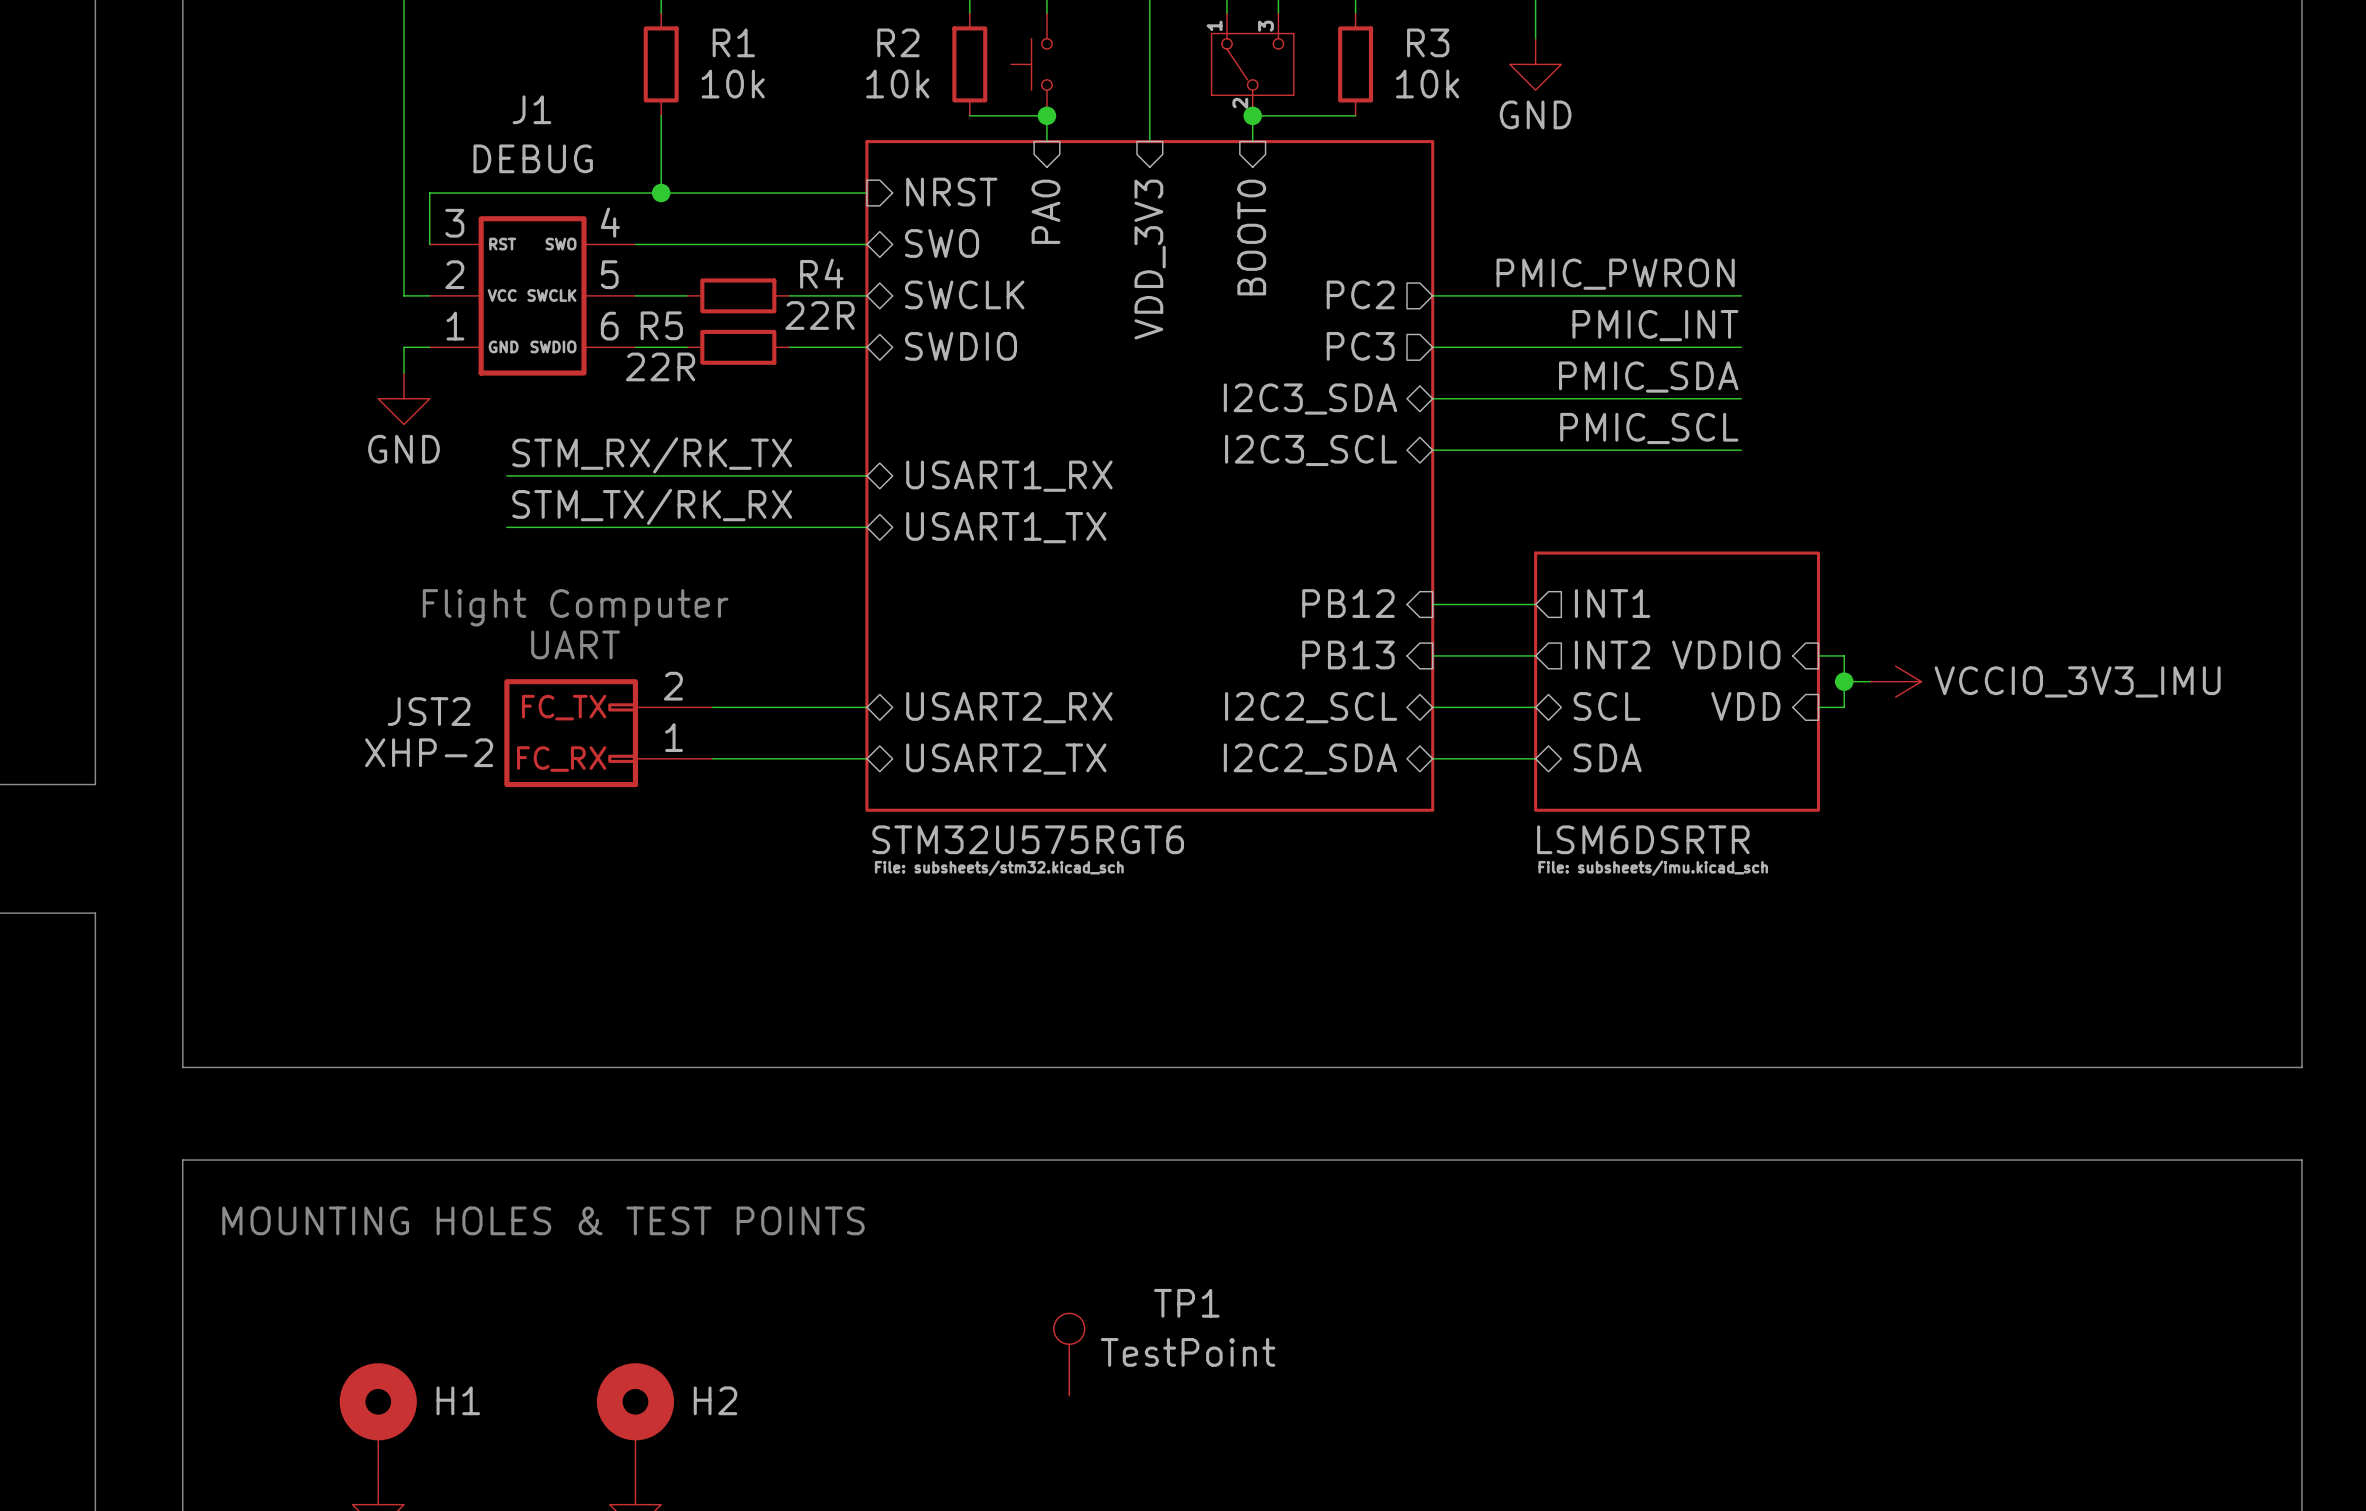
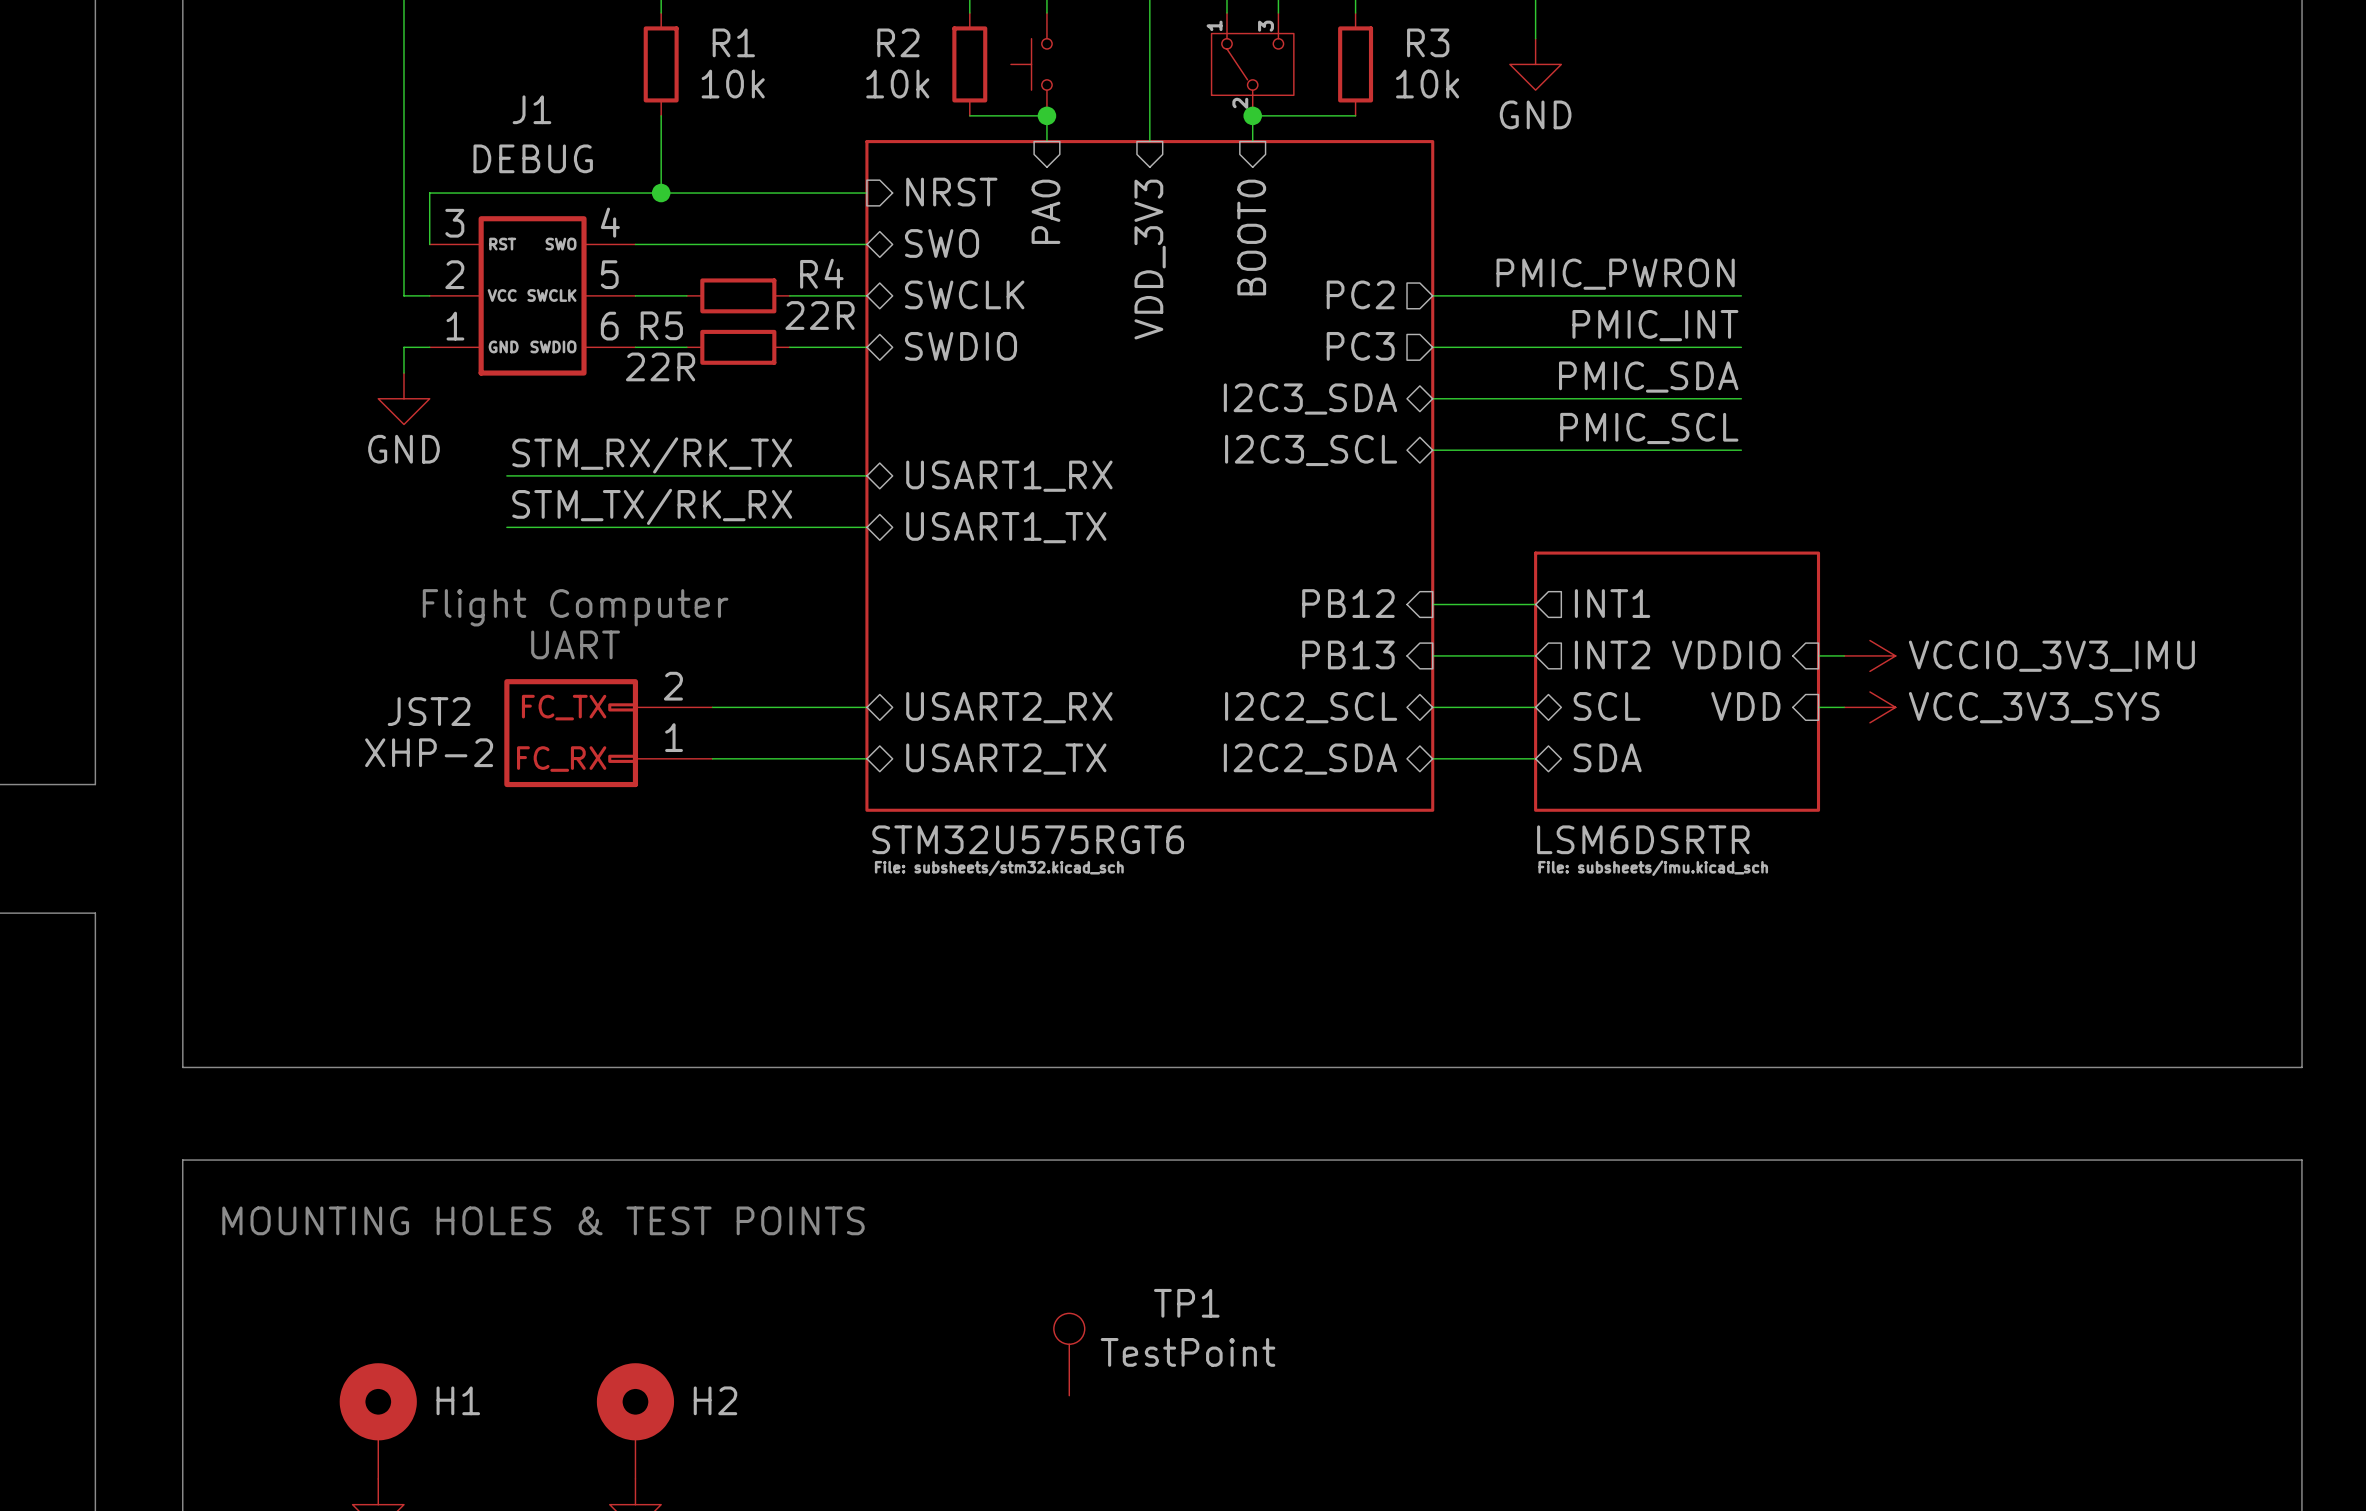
wire: (1844, 655) (1844, 707) -> none
wire: (1844, 681) (1869, 681) -> none
junction: (1844, 681) -> none
power symbol position: VCCIO_3V3_IMU (1895, 681) -> VCCIO_3V3_IMU (1869, 655)
power symbol: none -> VCC_3V3_SYS (1869, 707)

